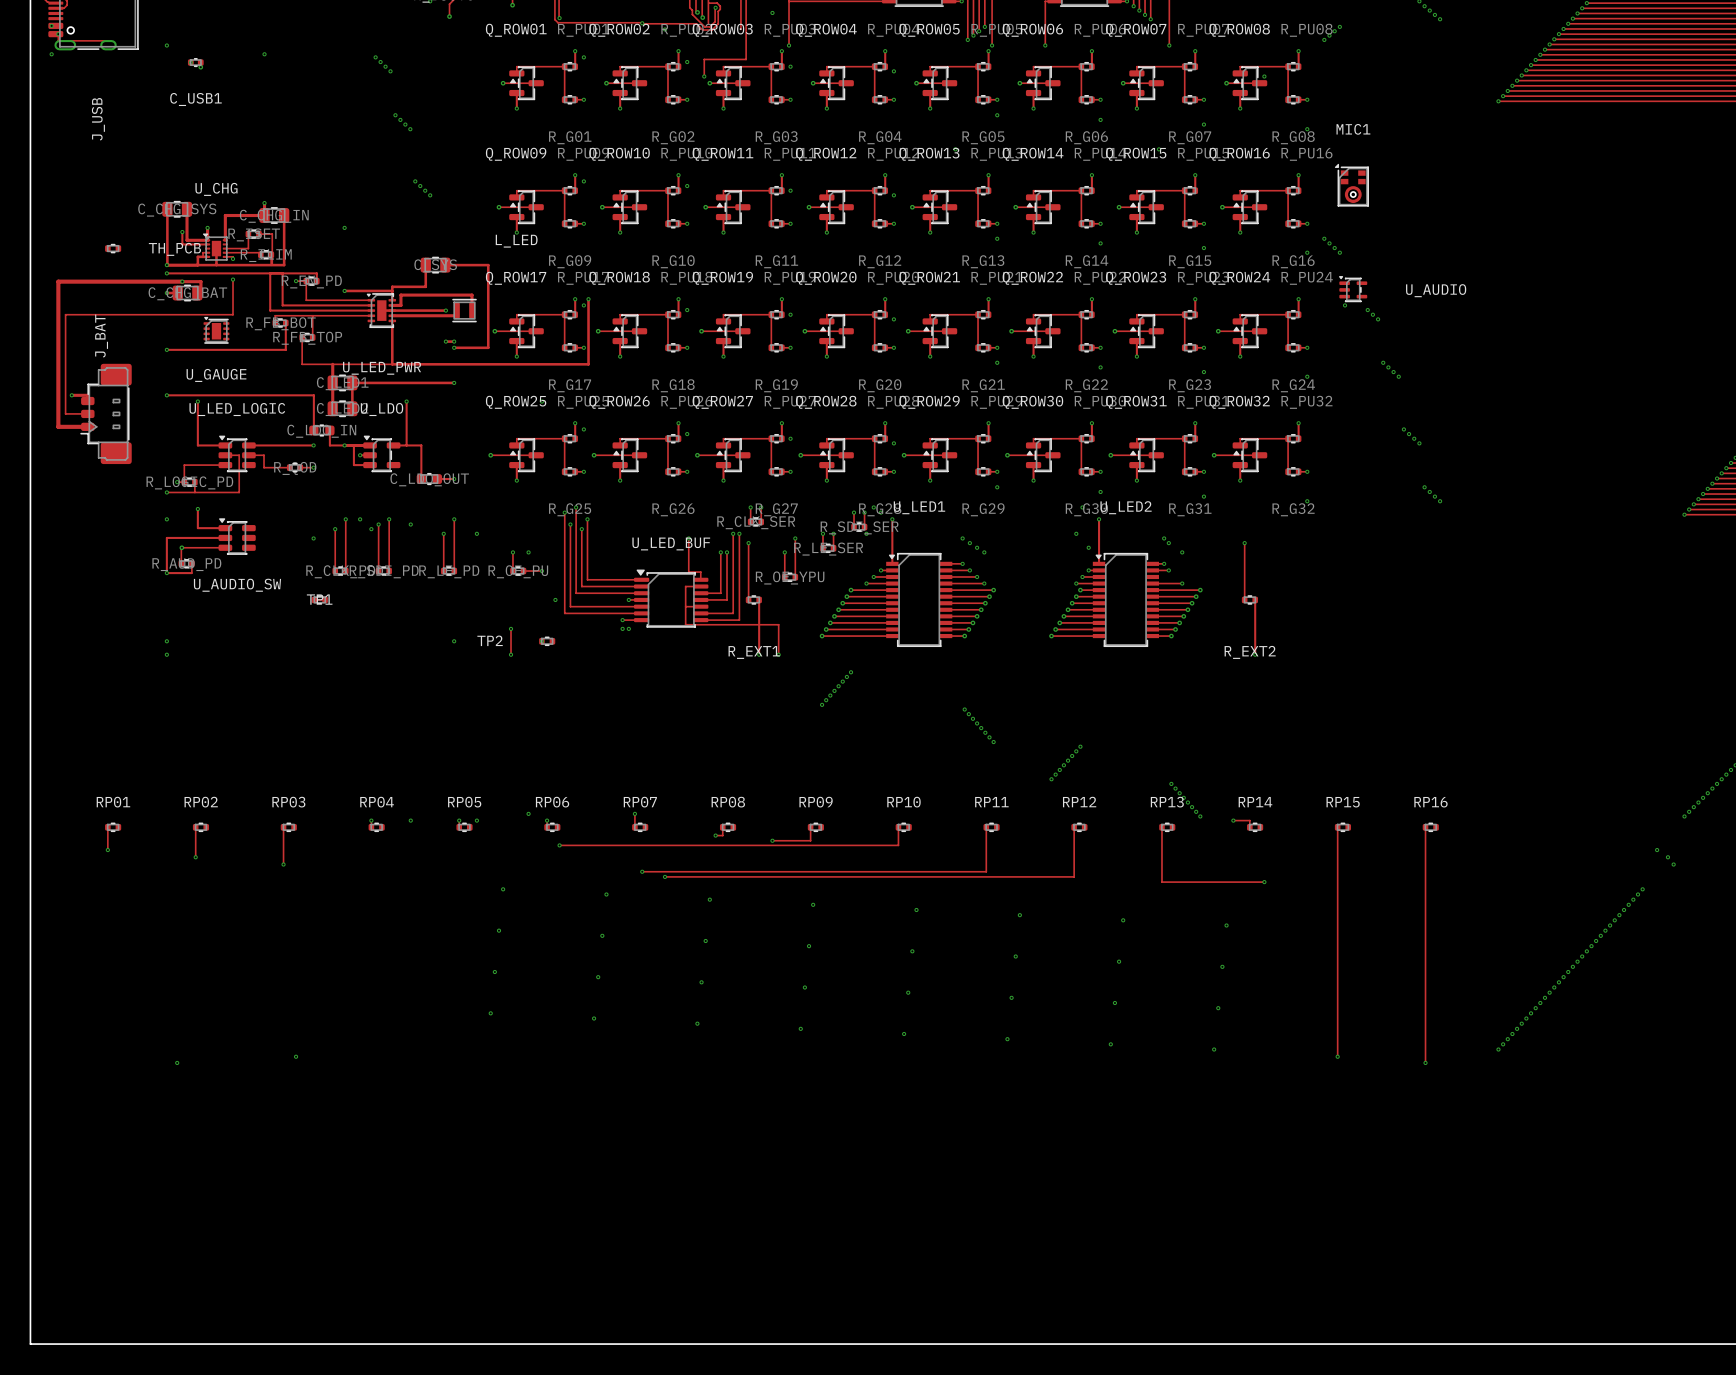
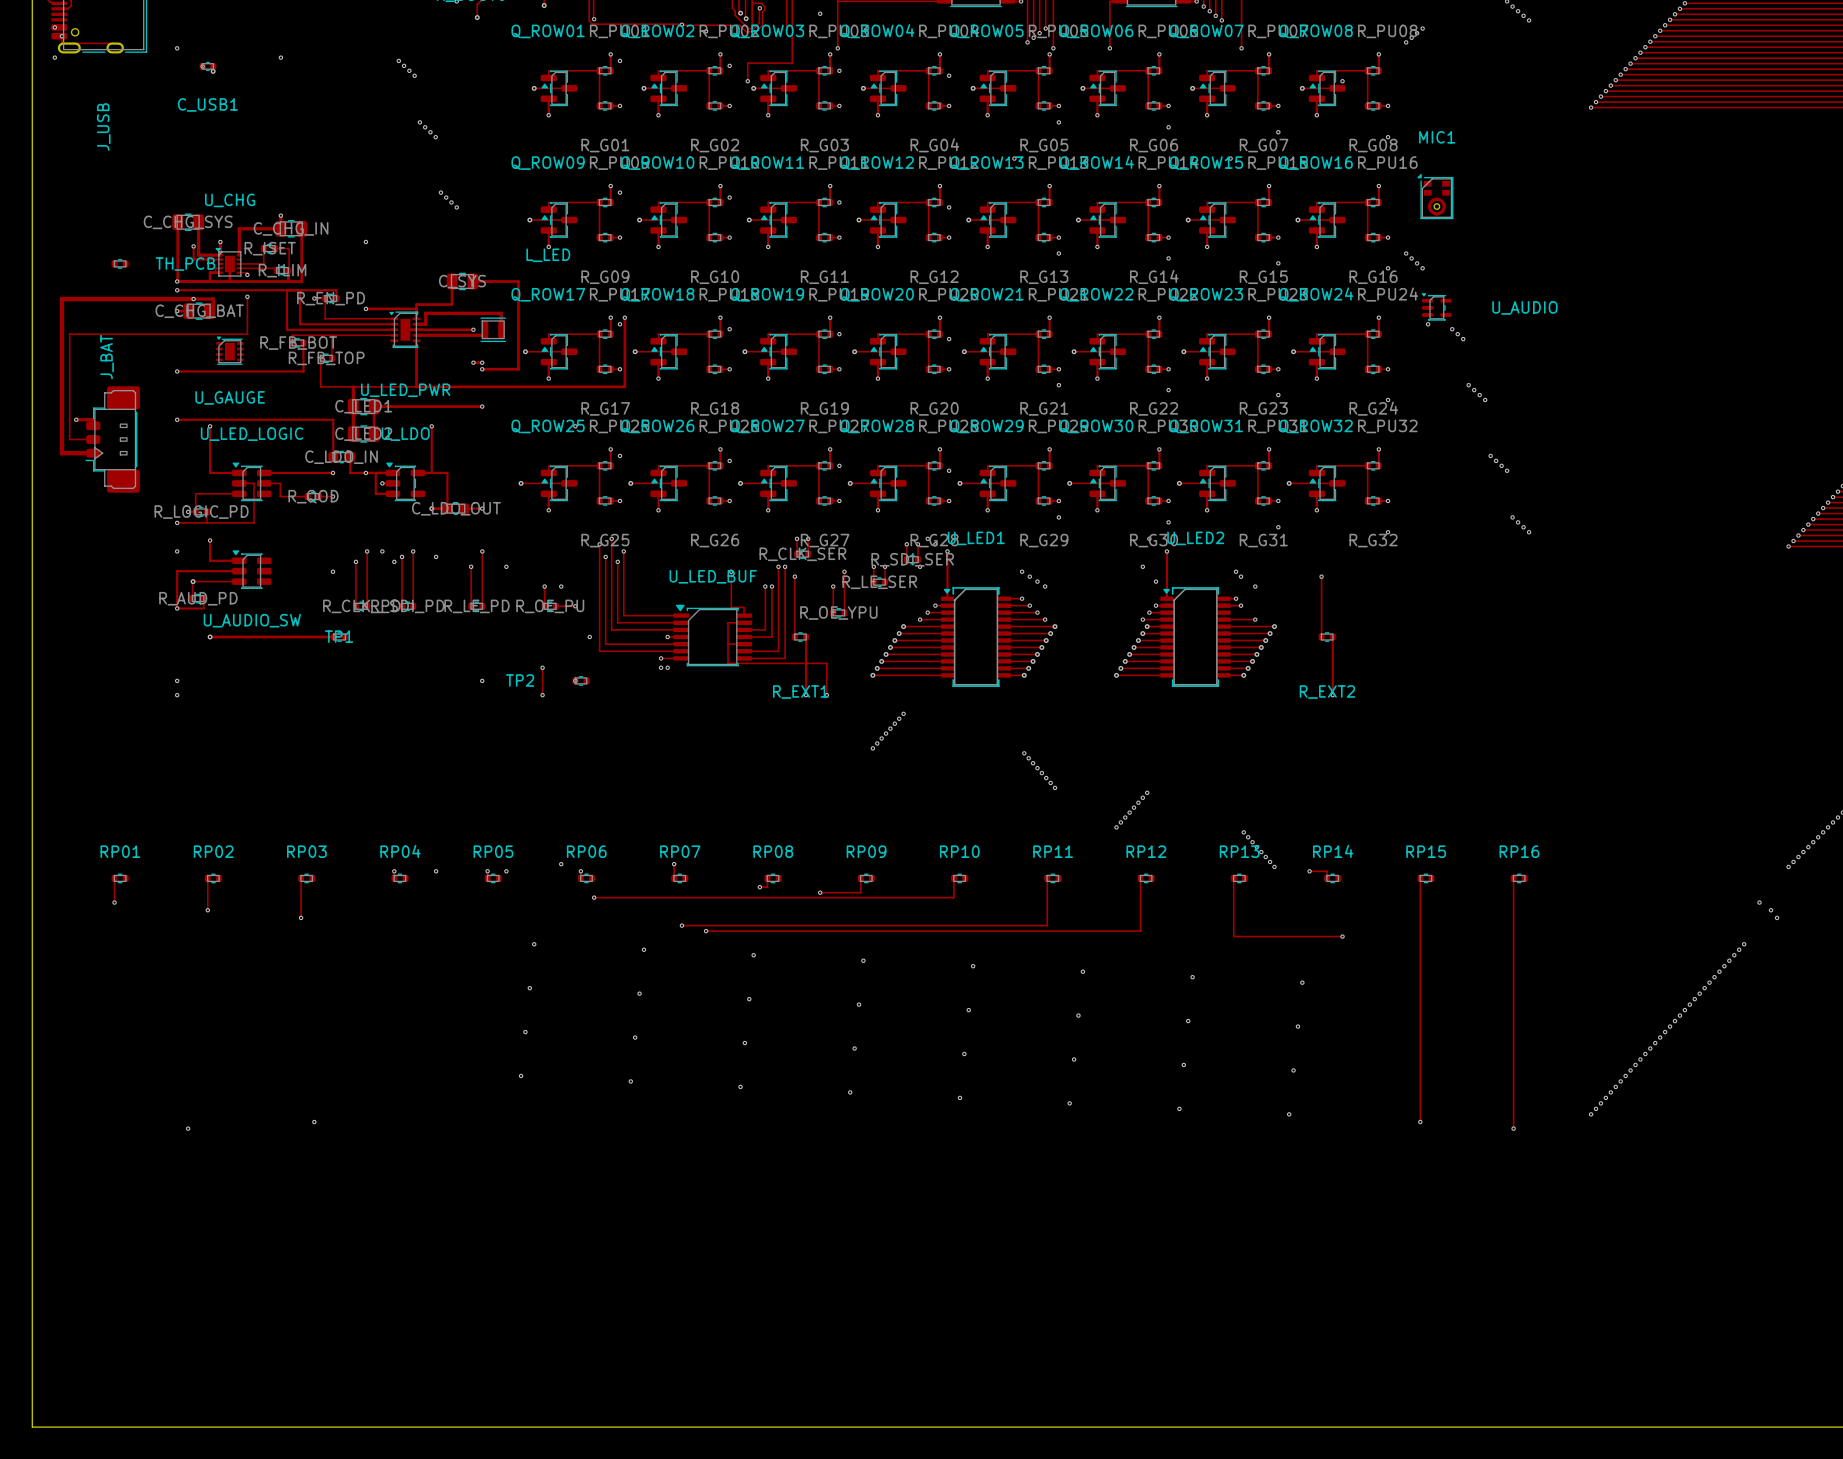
track: none -> (431, 508) (447, 508)
via: none -> (431, 508)
track: none -> (210, 637) (333, 637)
via: none -> (210, 637)

